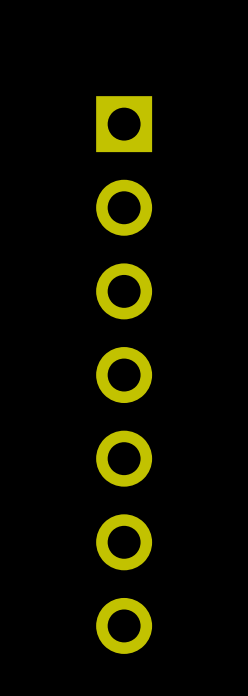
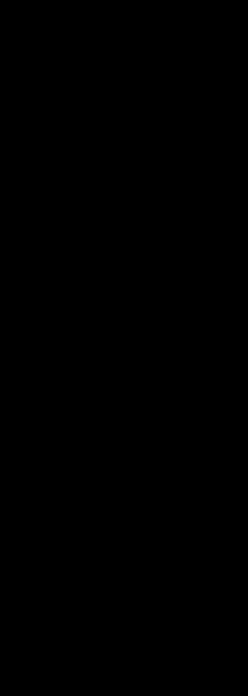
part: (124, 375) -> none

